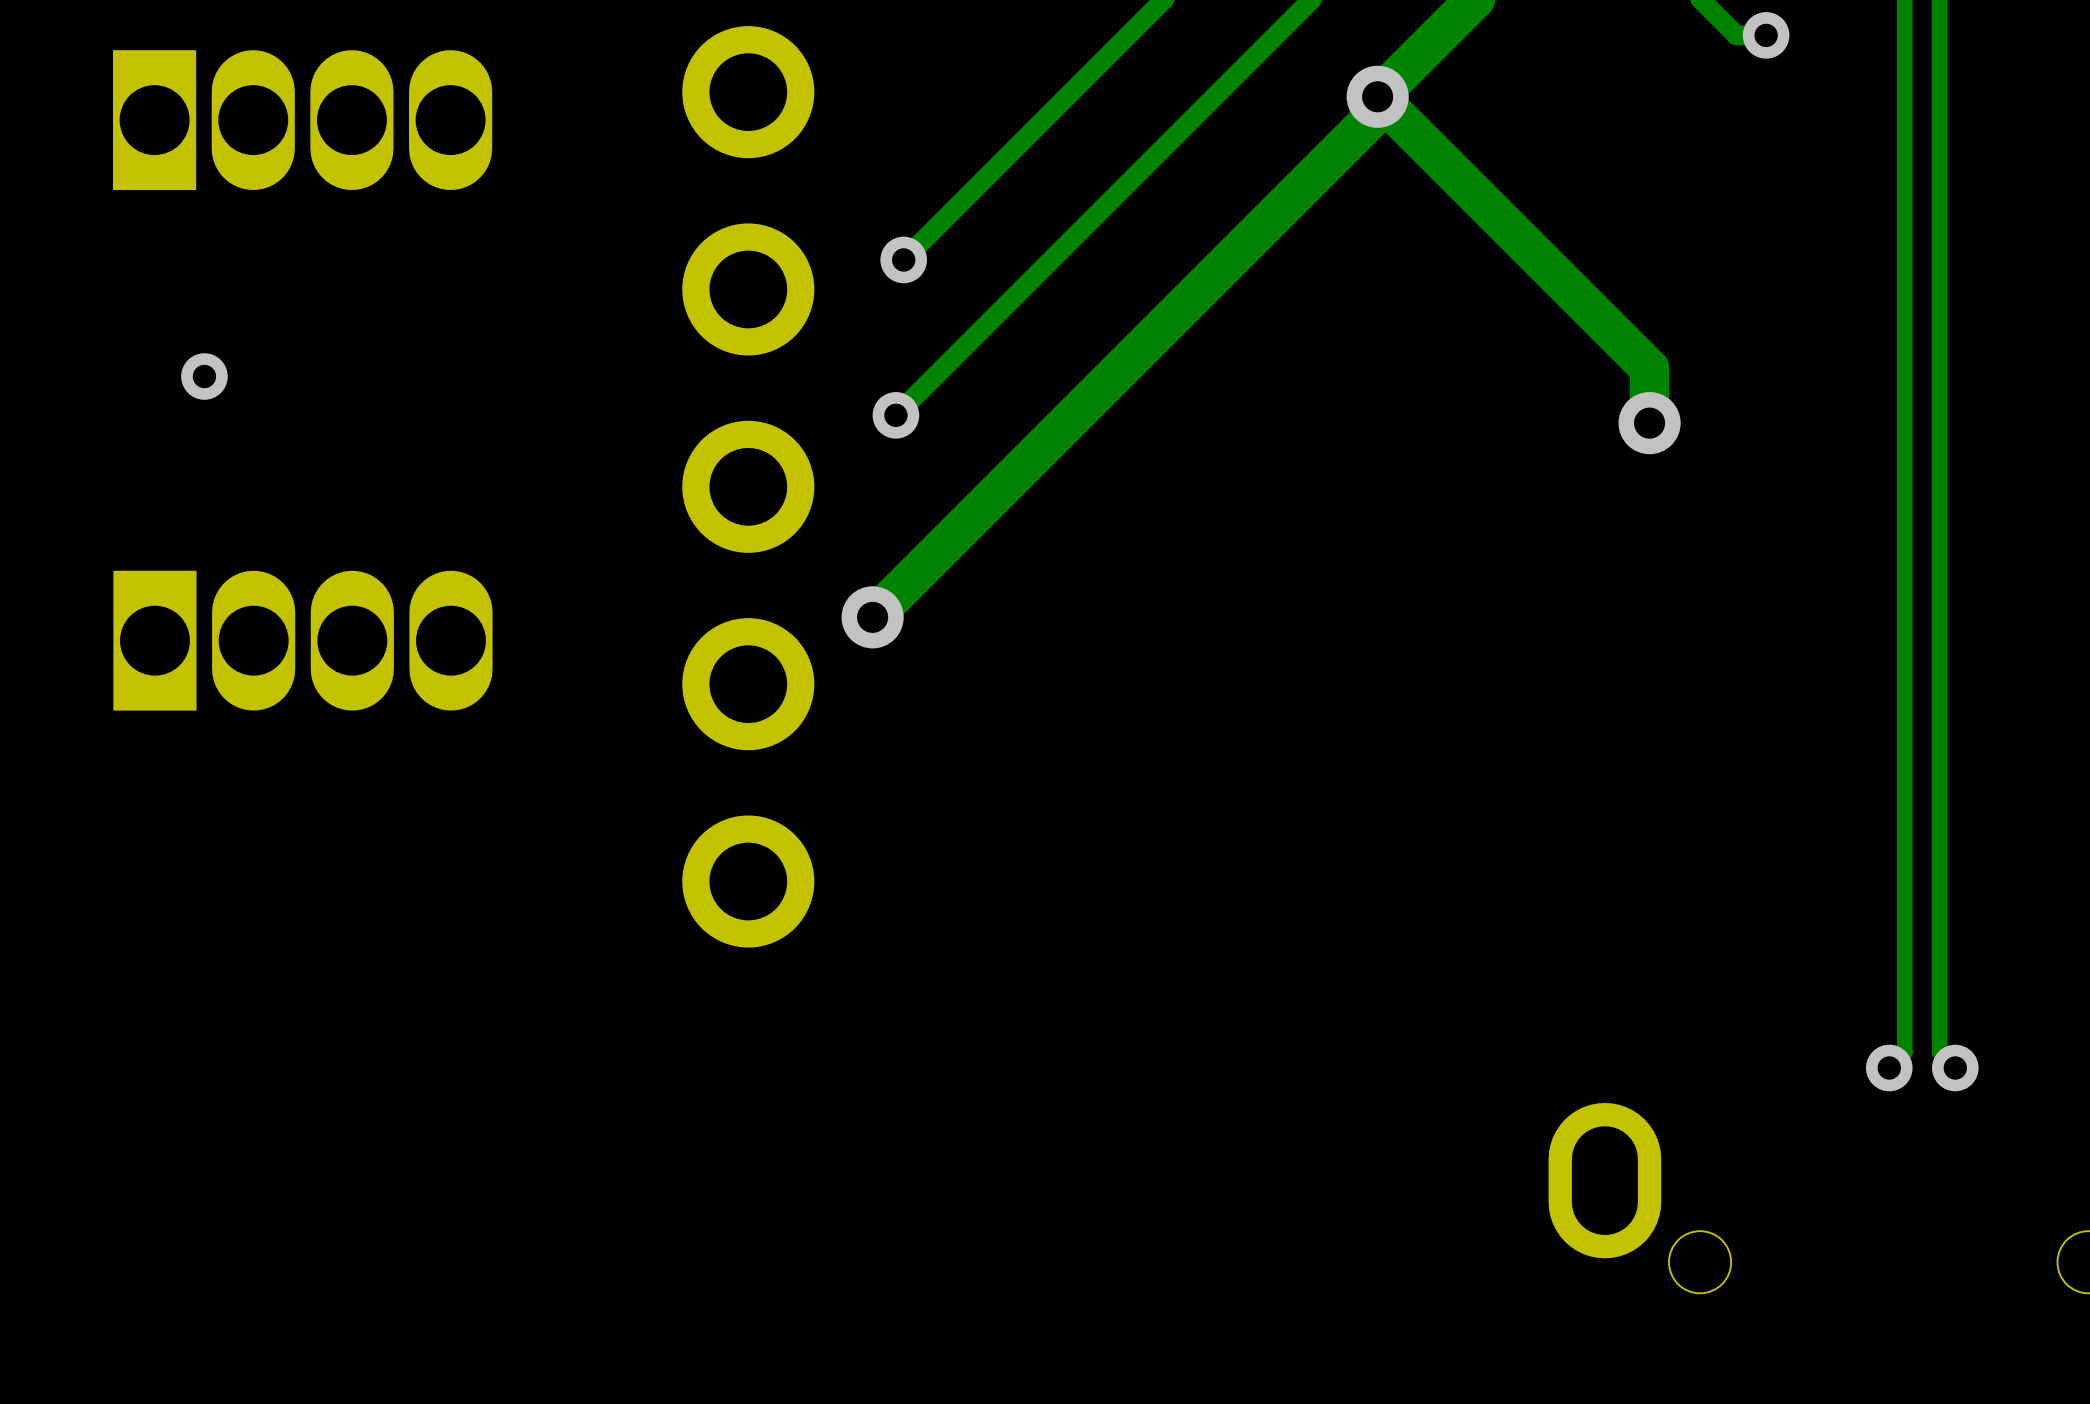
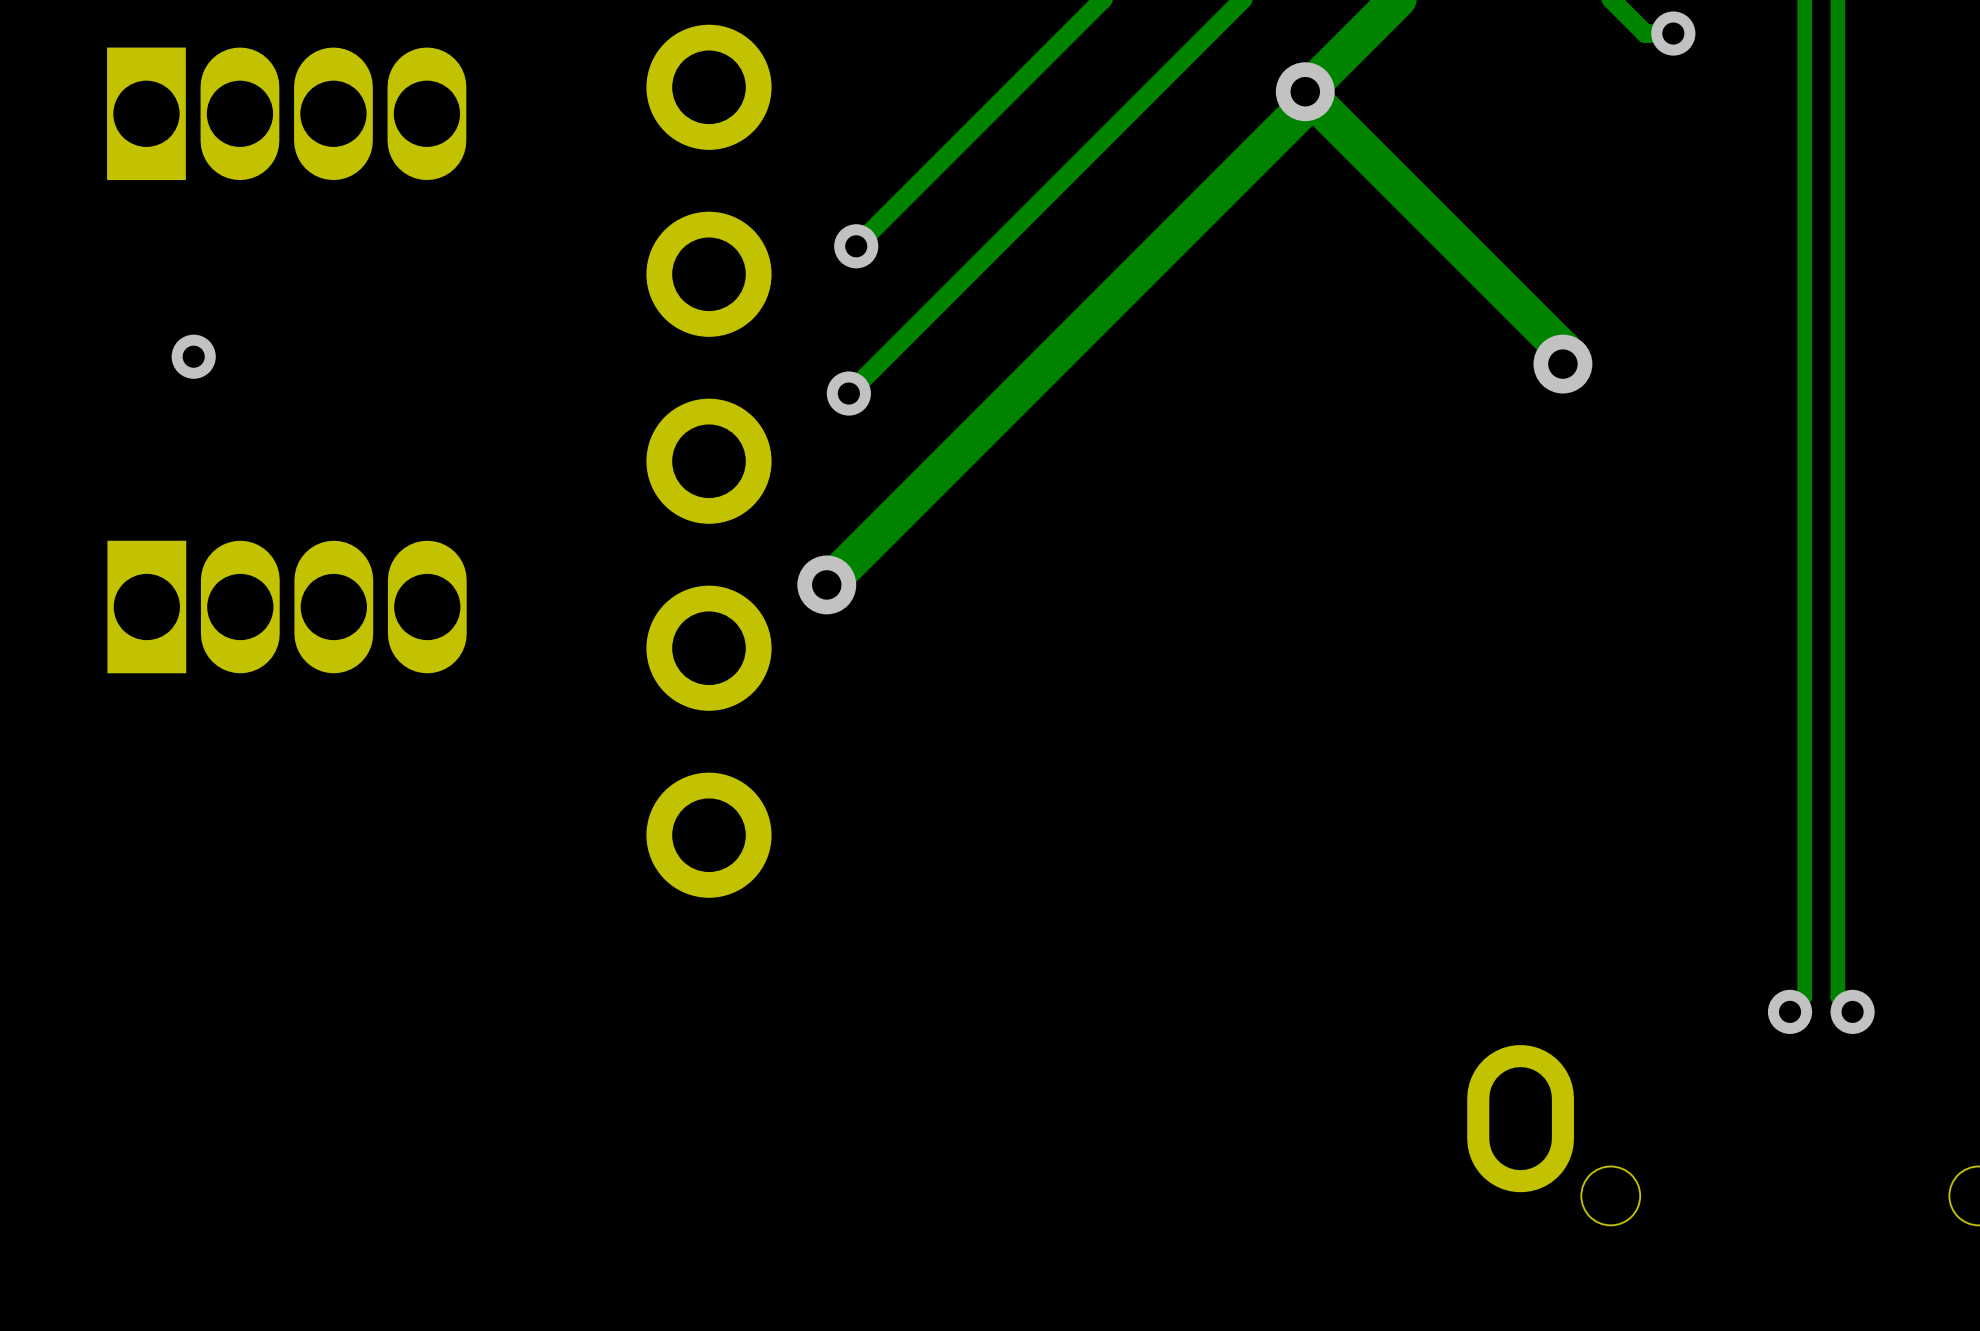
via position: (1649, 423) -> (1562, 364)

